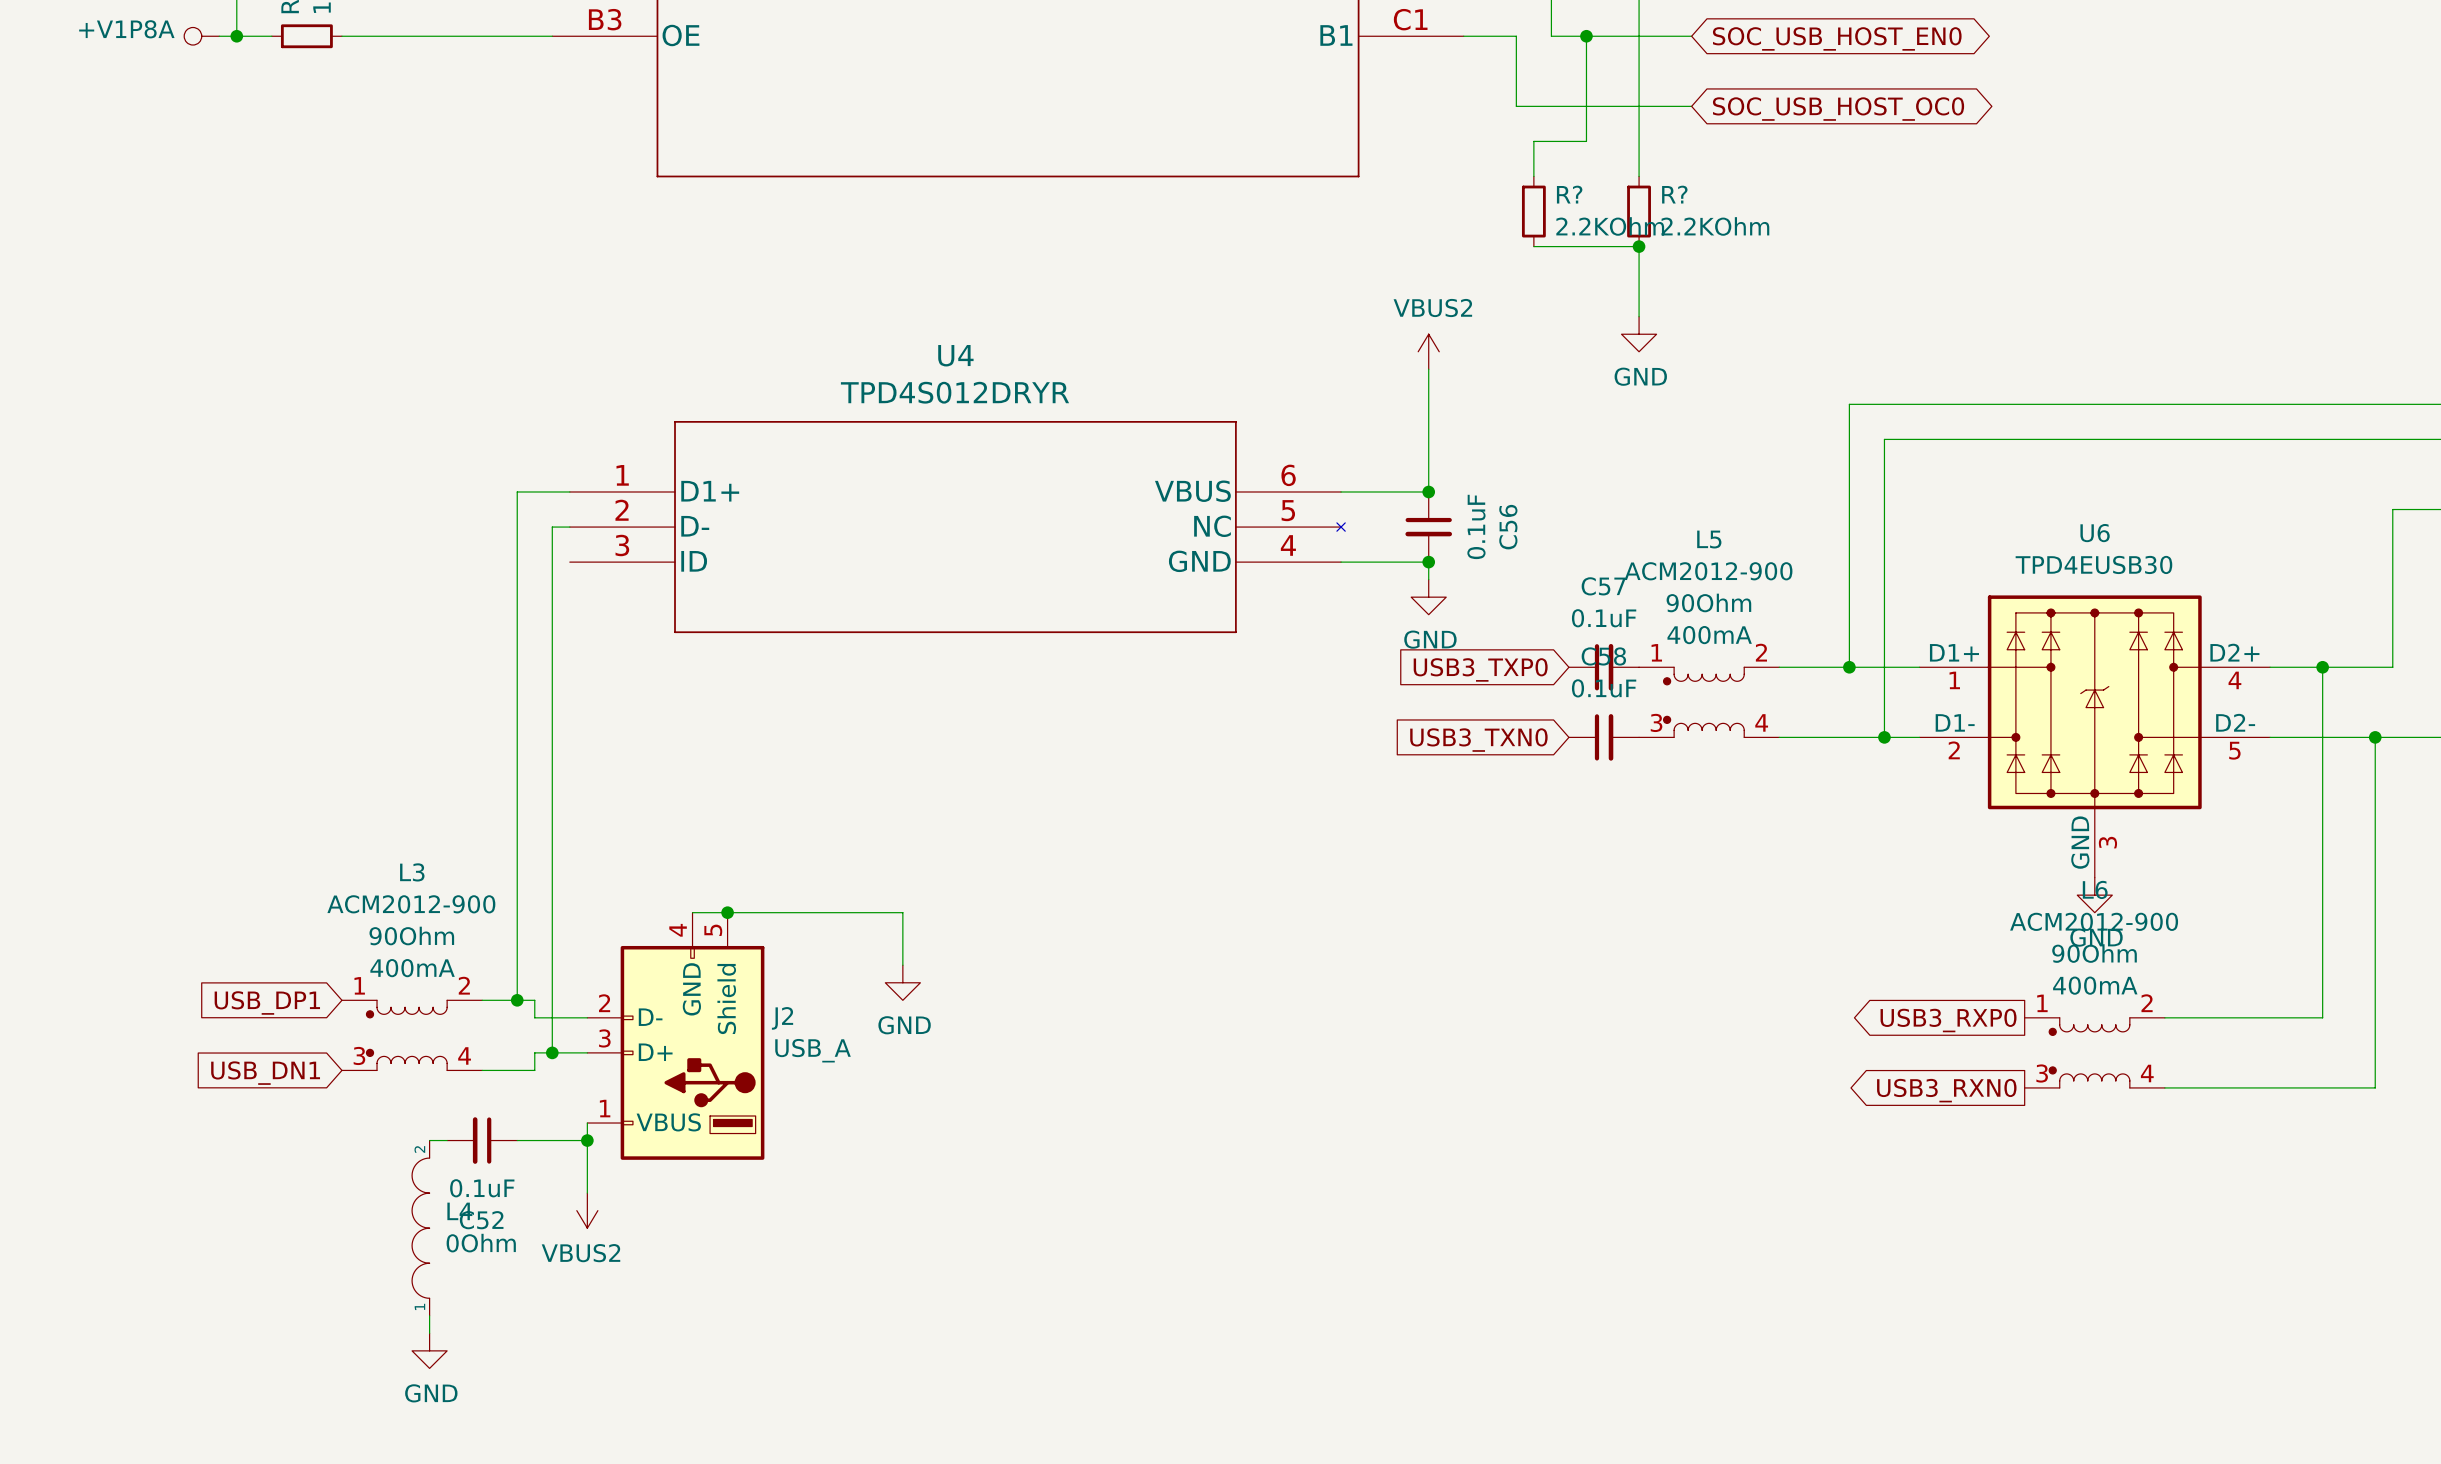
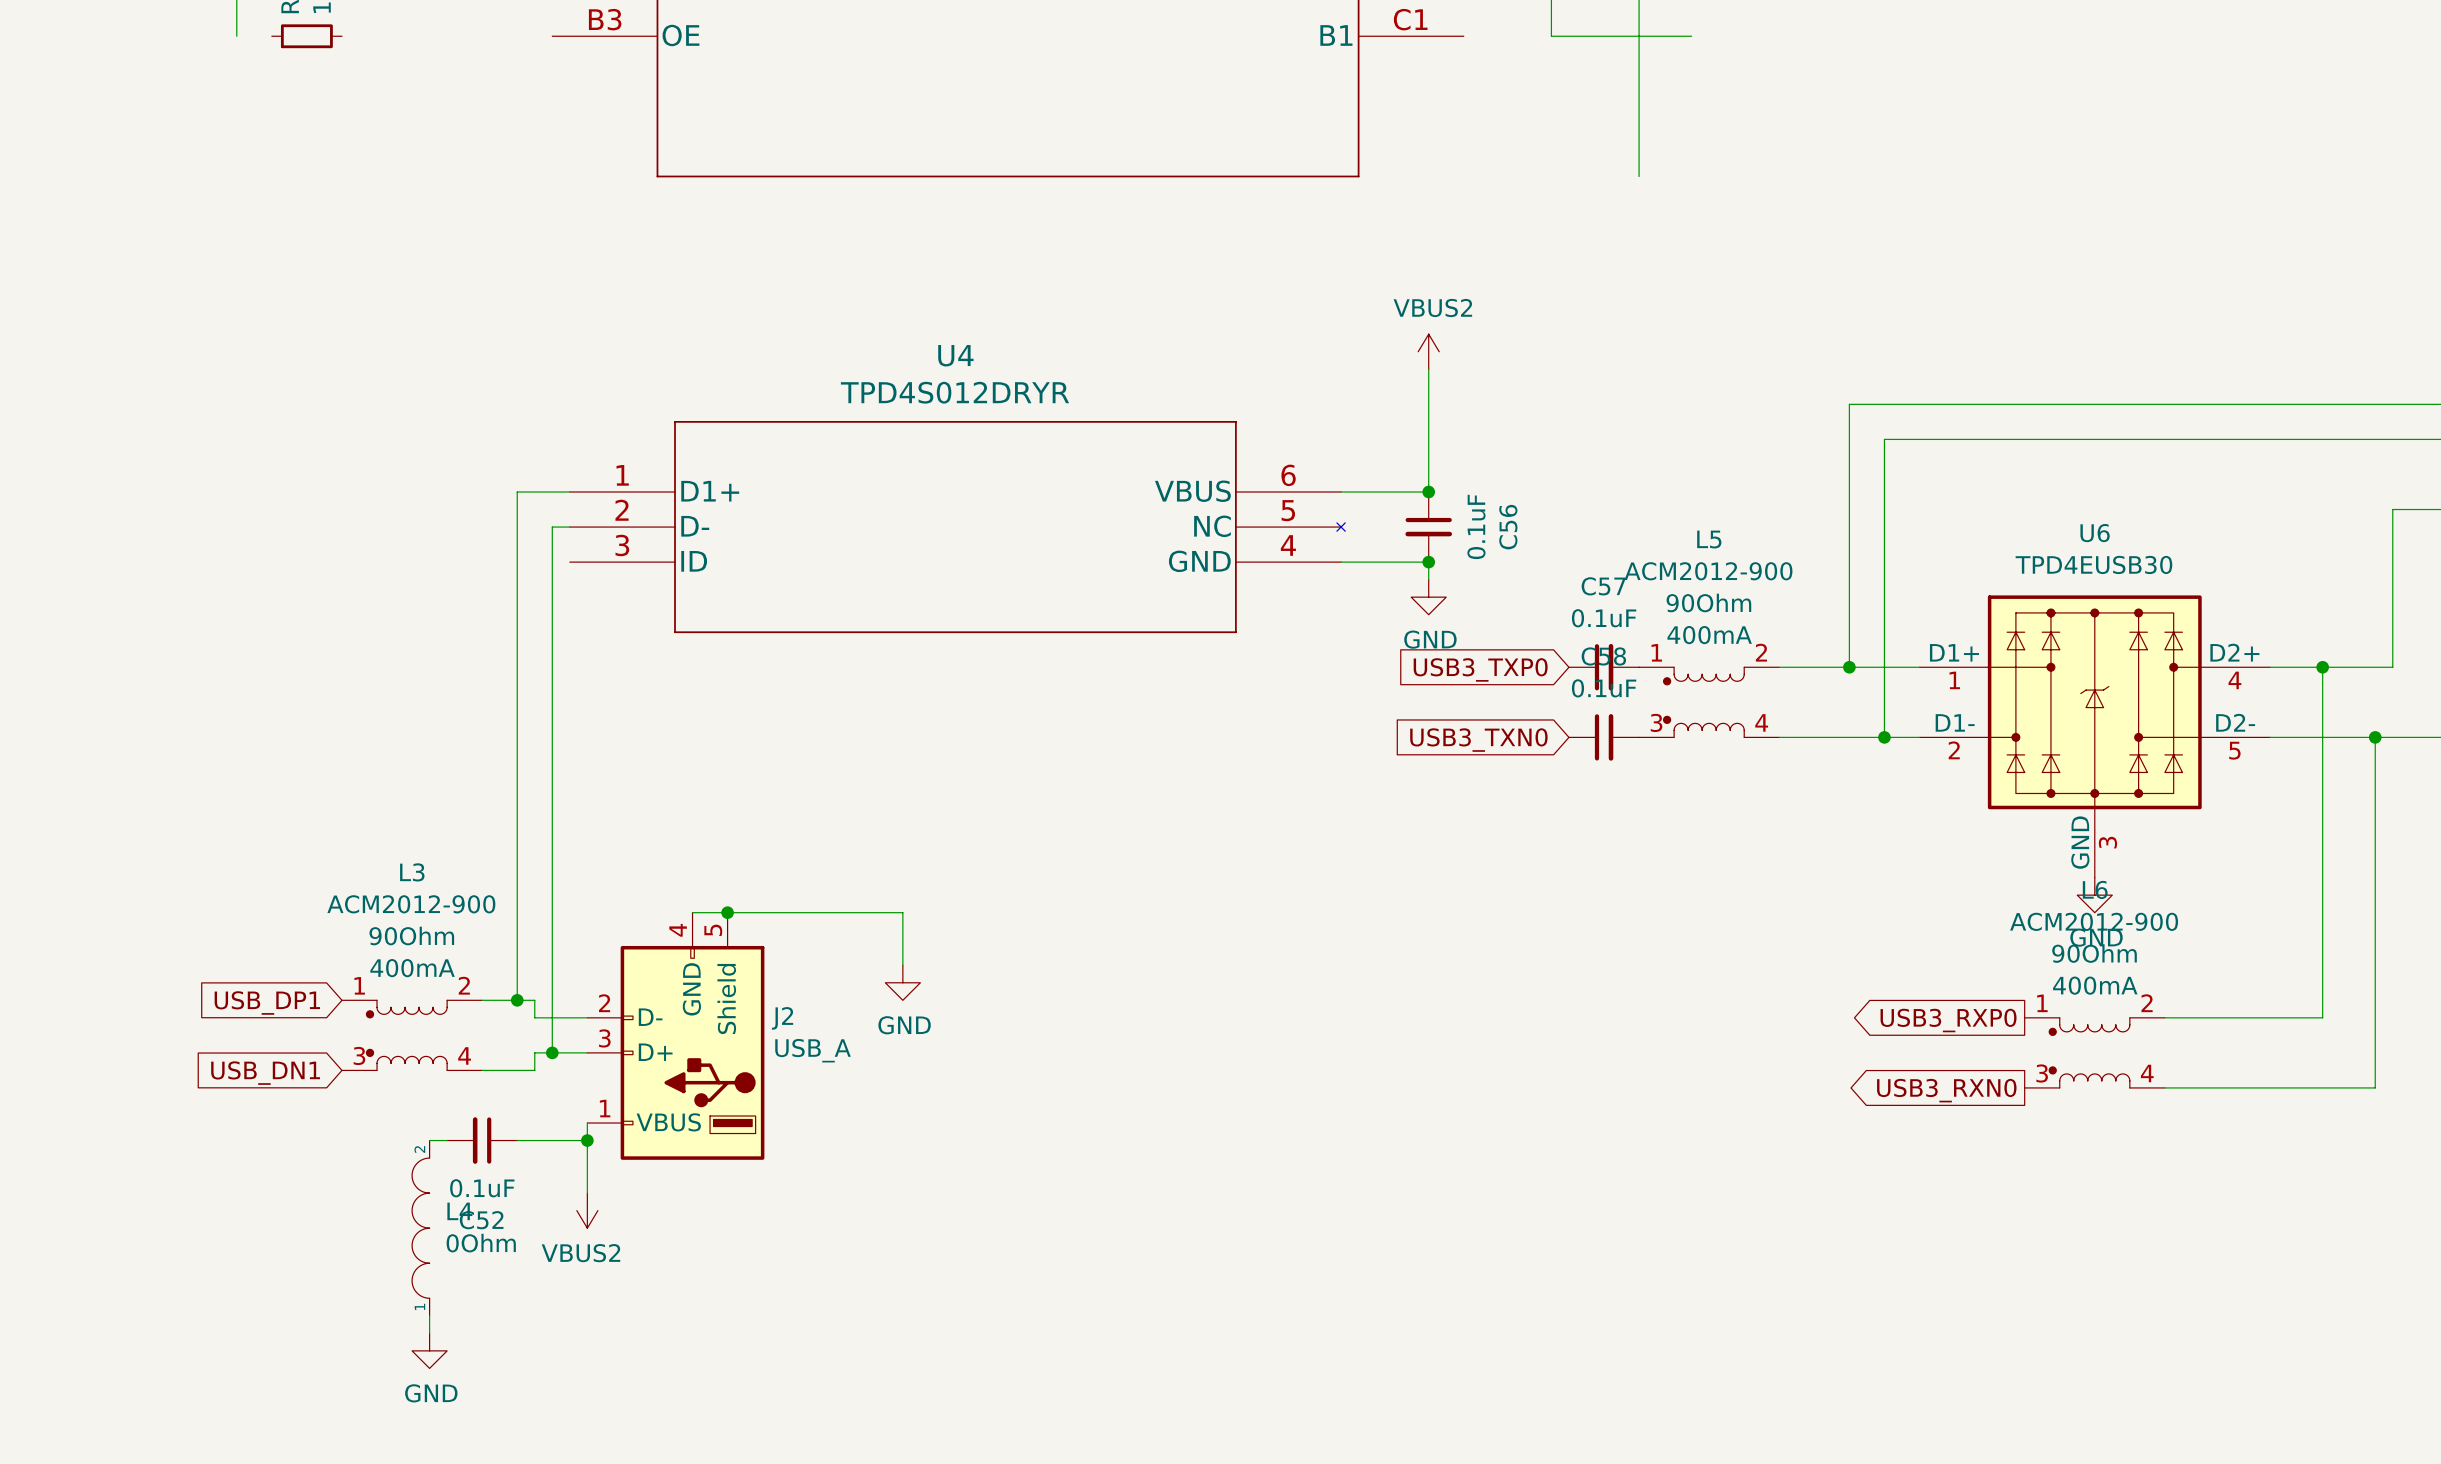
power symbol: +V1P8A (201, 36) -> none
wire: (219, 36) (271, 36) -> none
junction: (236, 36) -> none
wire: (341, 36) (552, 36) -> none
wire: (1463, 36) (1516, 36) (1516, 106) (1691, 106) -> none
wire: (1586, 36) (1586, 141) (1533, 141) (1533, 176) -> none
junction: (1586, 36) -> none
global label: SOC_USB_HOST_EN0 (1837, 38) -> none
global label: SOC_USB_HOST_OC0 (1838, 109) -> none
R?: 2.2KOhm (1533, 211) -> none
R?: 2.2KOhm (1639, 211) -> none
wire: (1533, 246) (1639, 246) (1639, 316) -> none
junction: (1639, 246) -> none
power symbol: GND (1639, 334) -> none

